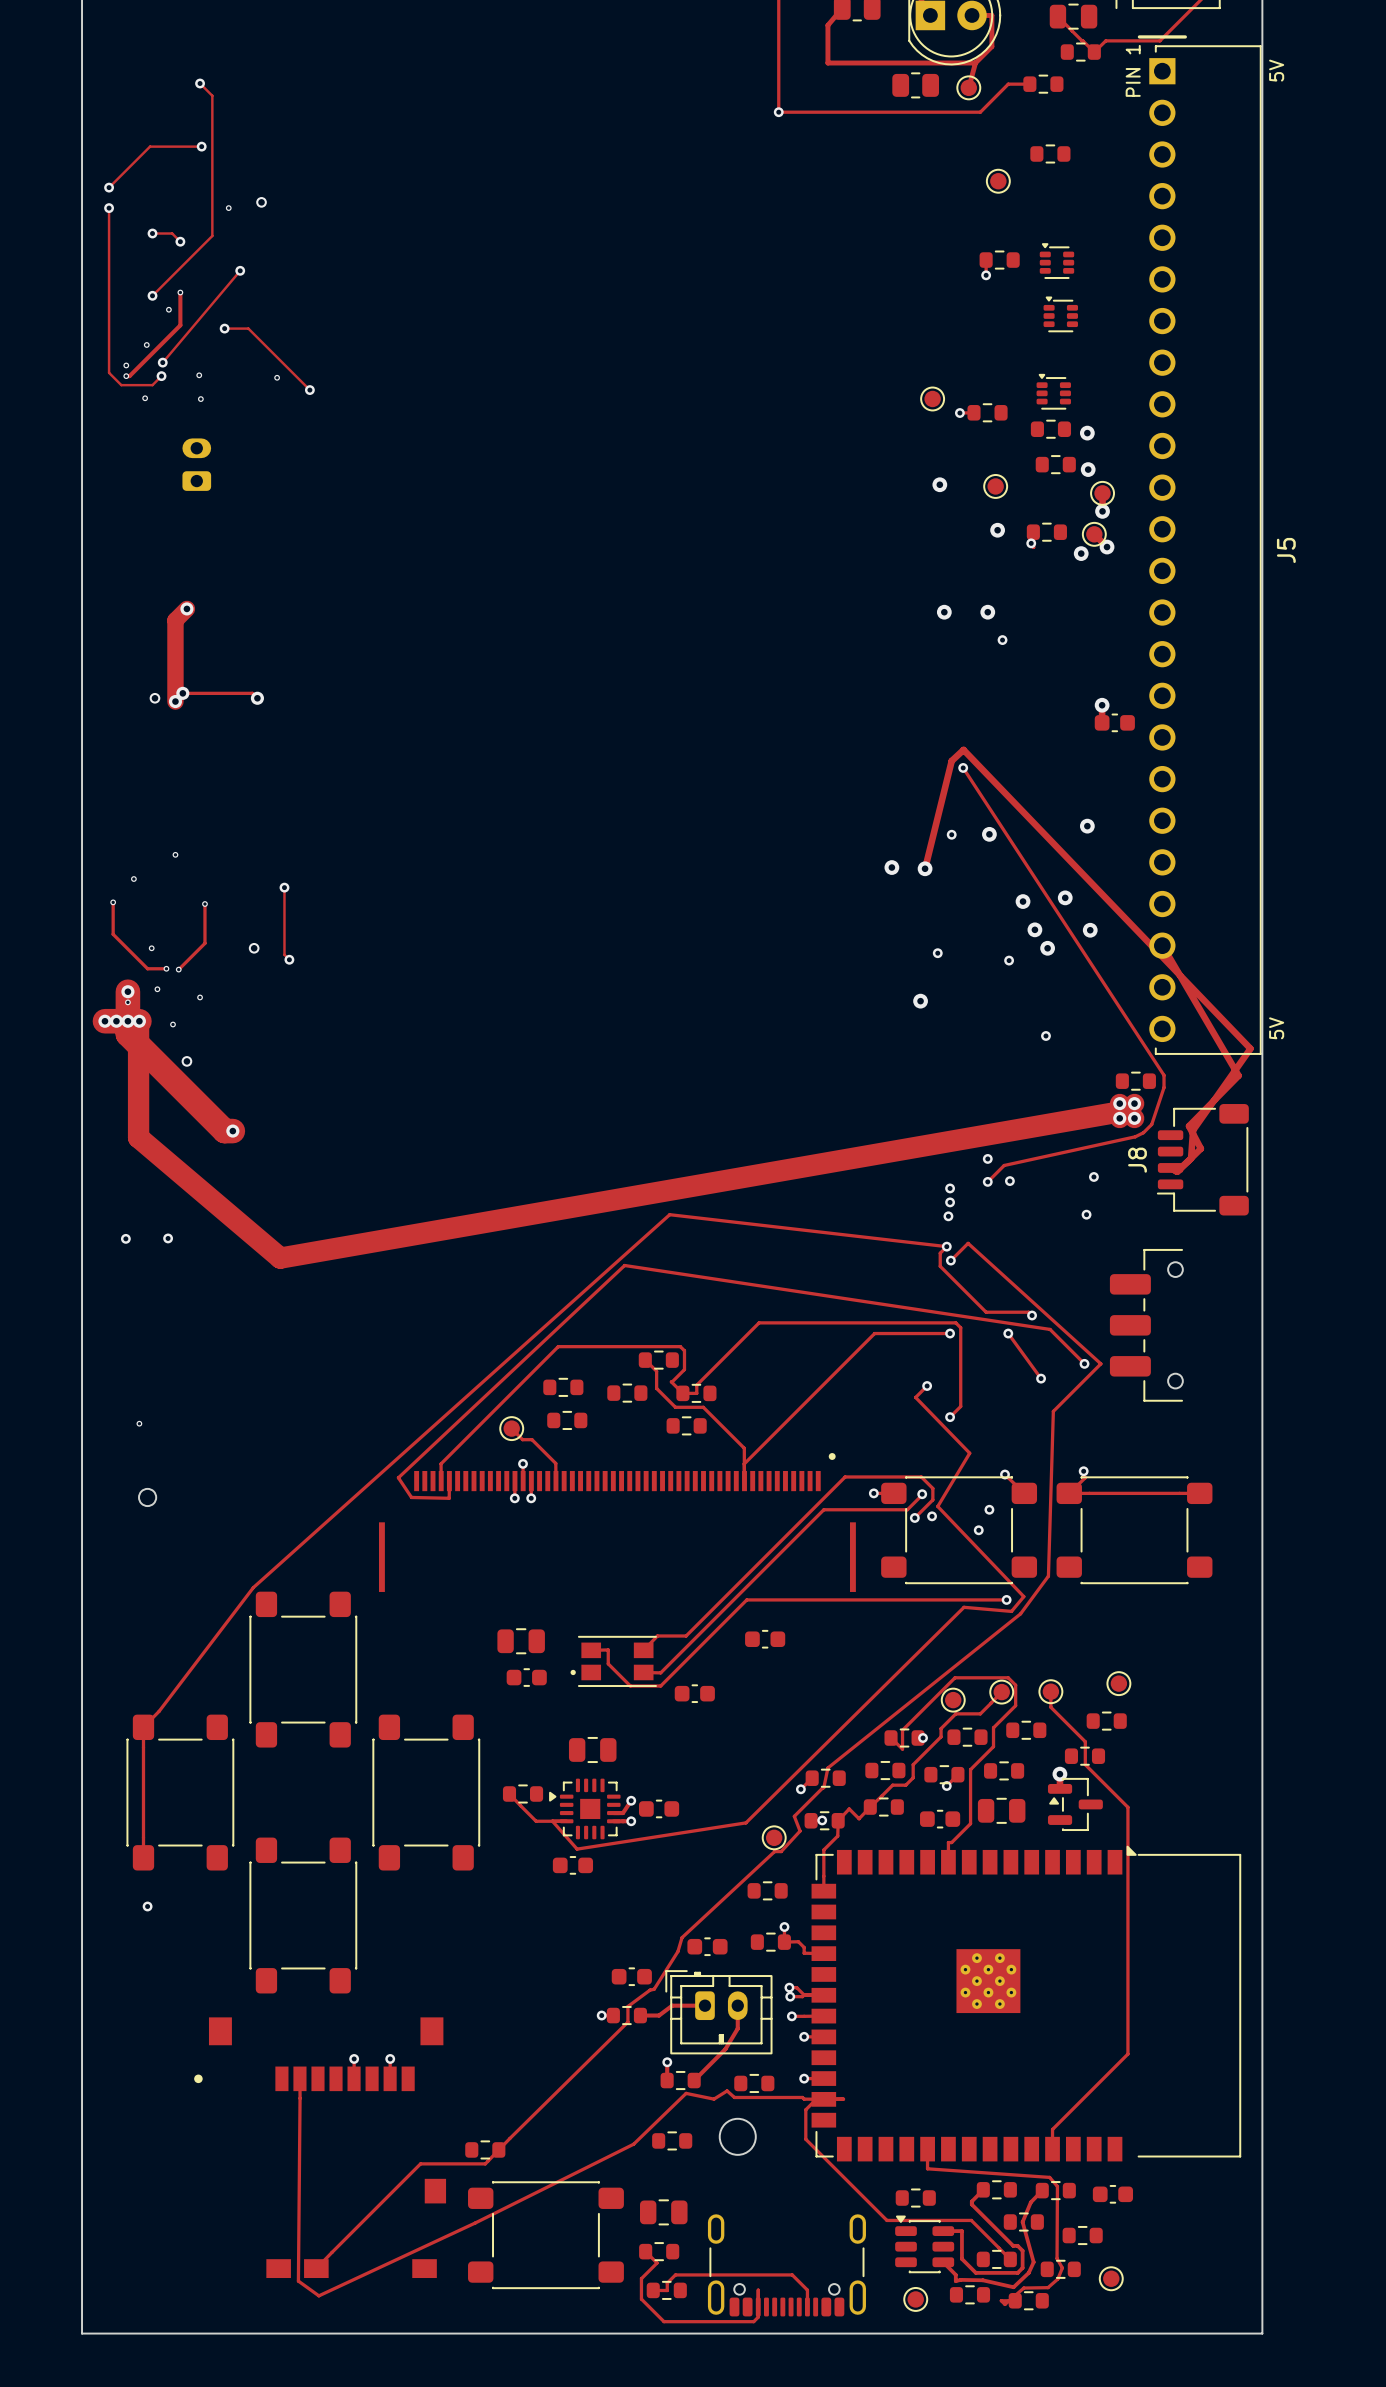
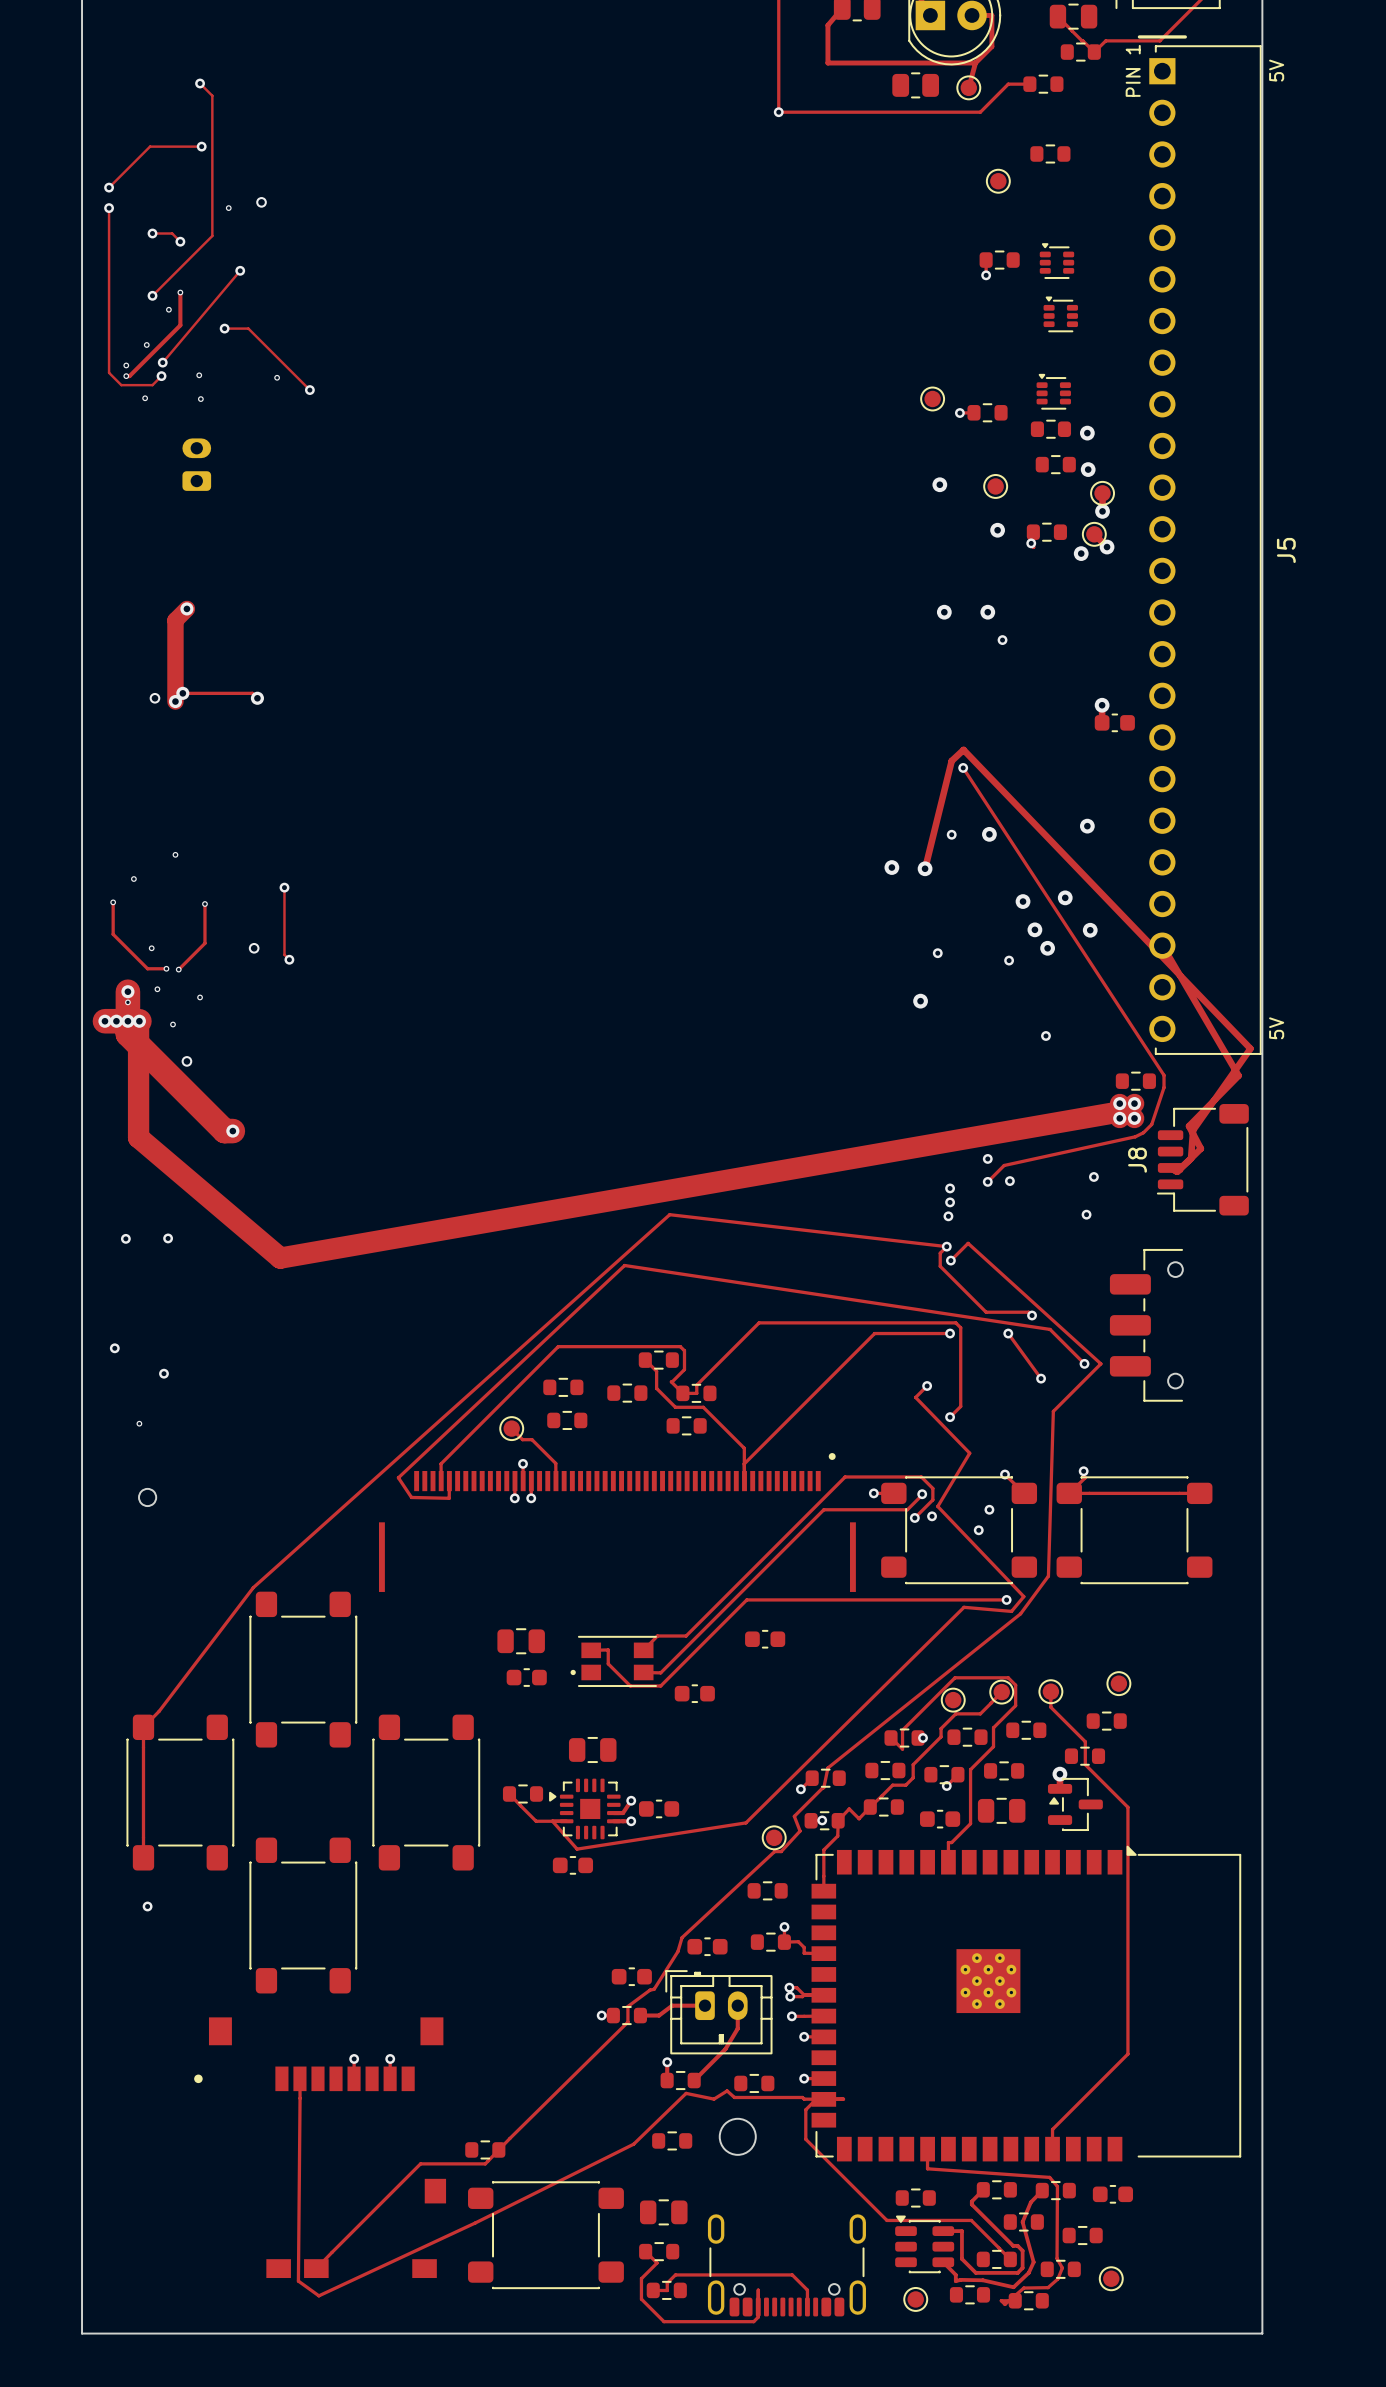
via: none -> (114, 1348)
via: none -> (163, 1373)

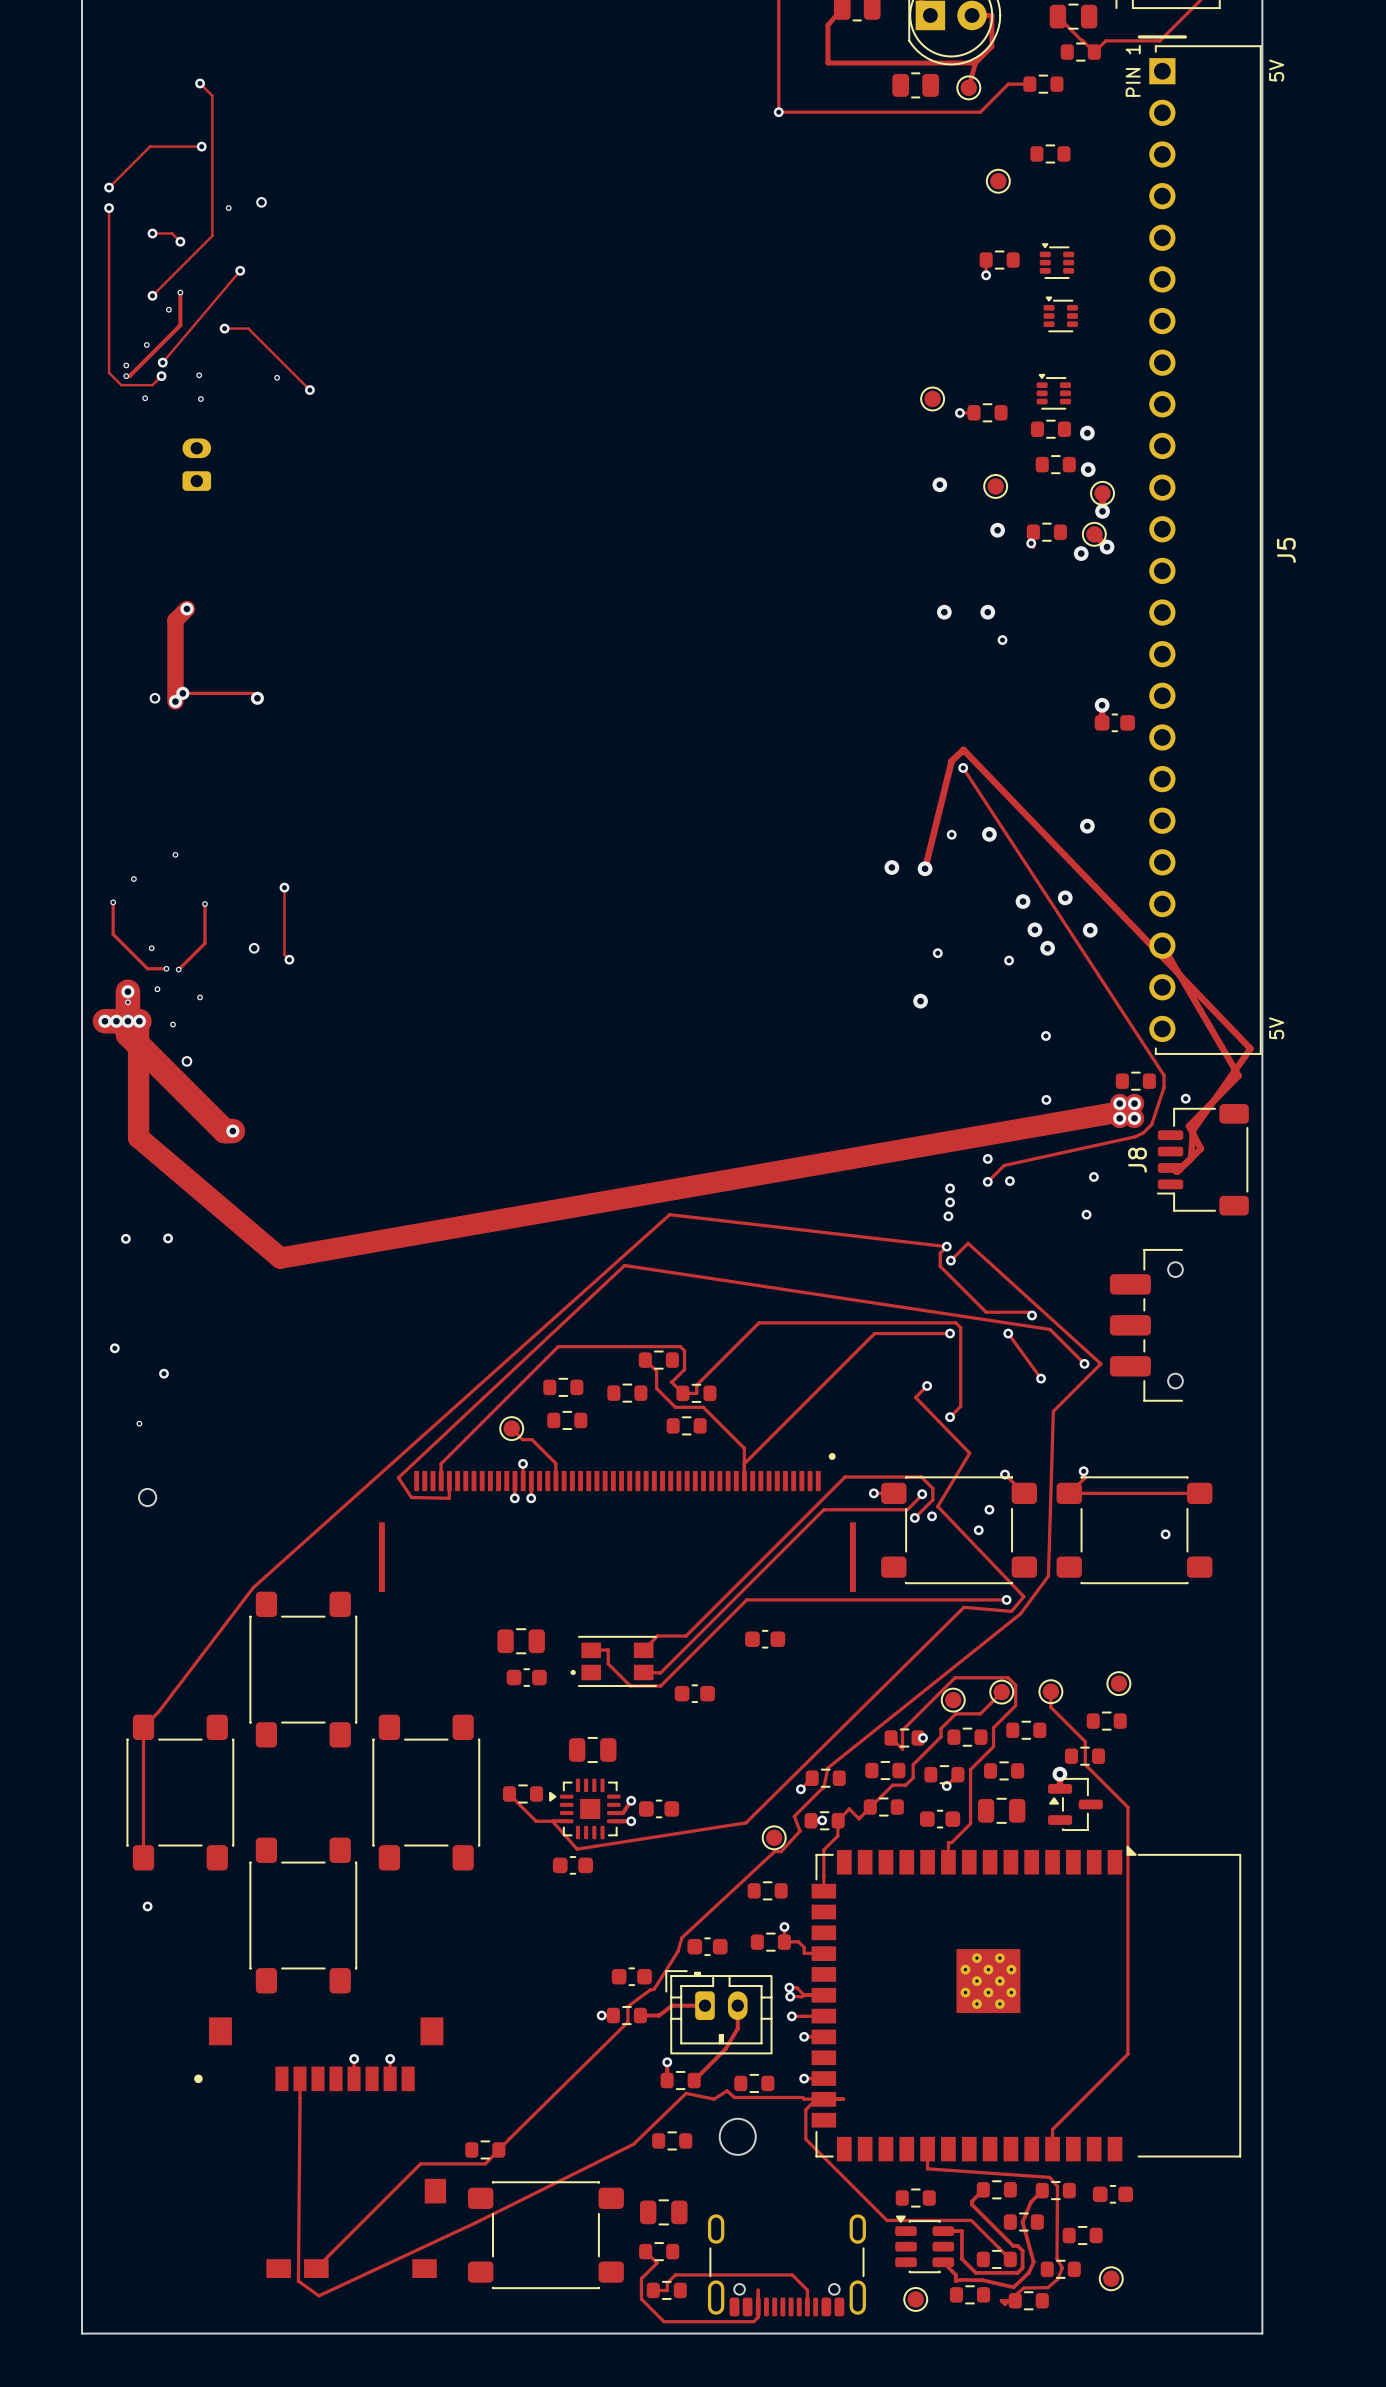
via: none -> (1185, 1098)
via: none -> (1046, 1099)
via: none -> (1165, 1534)

